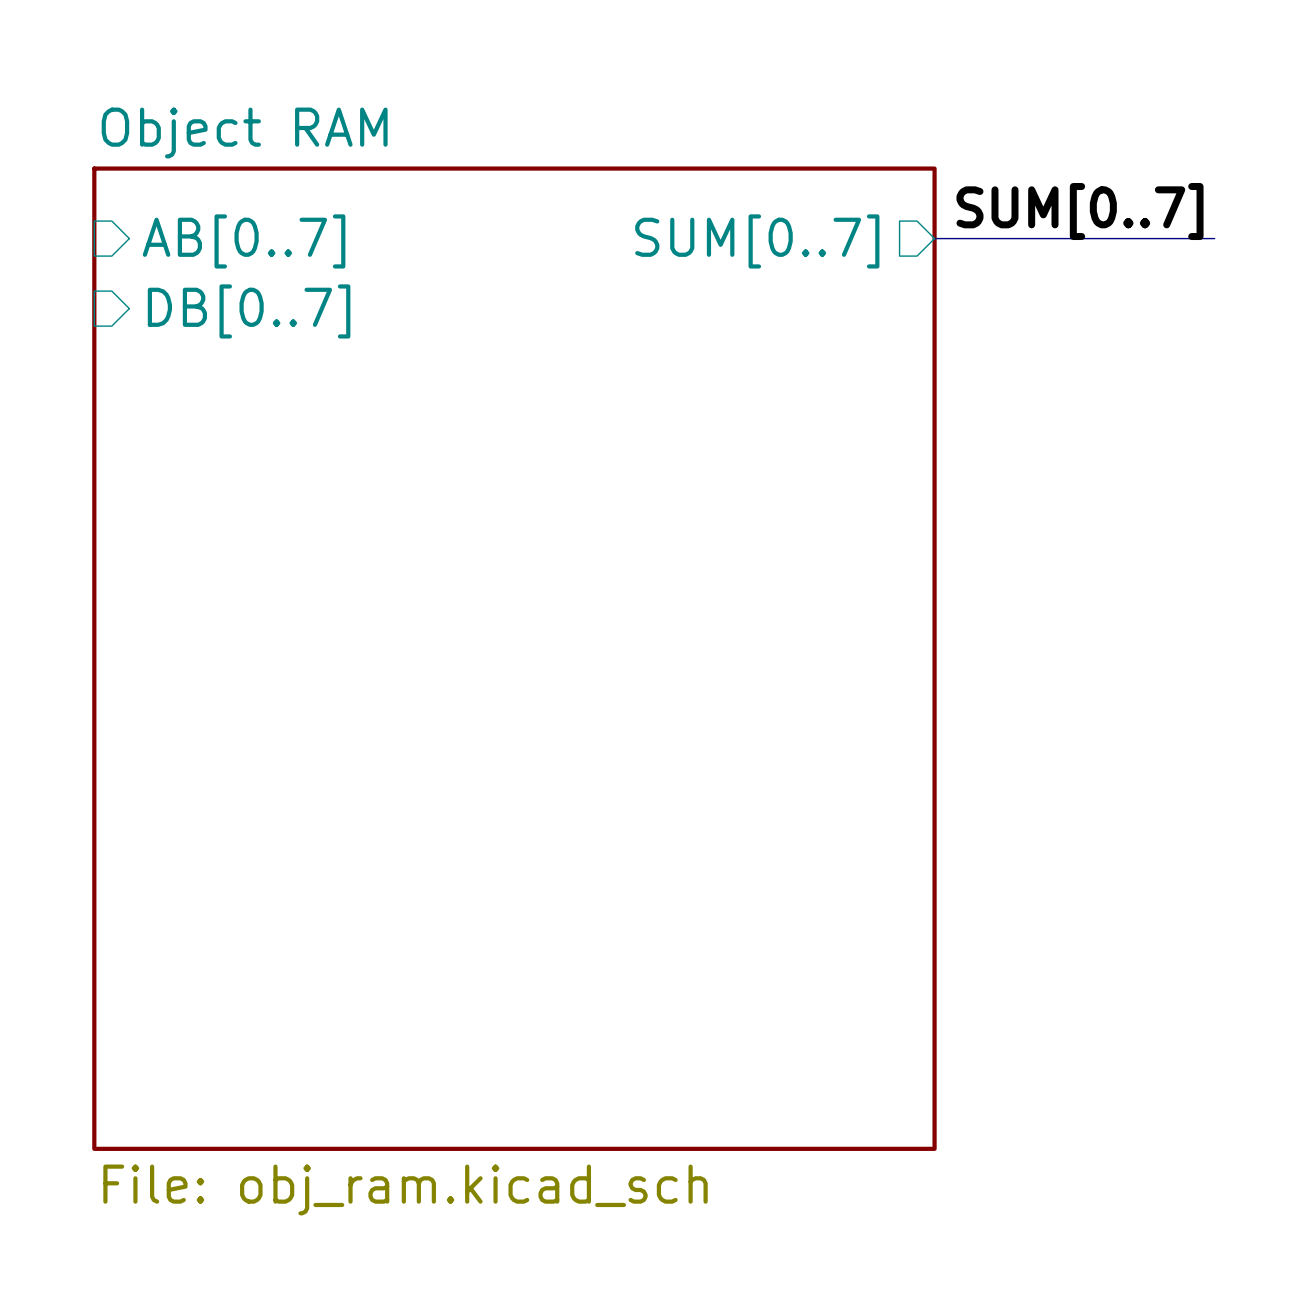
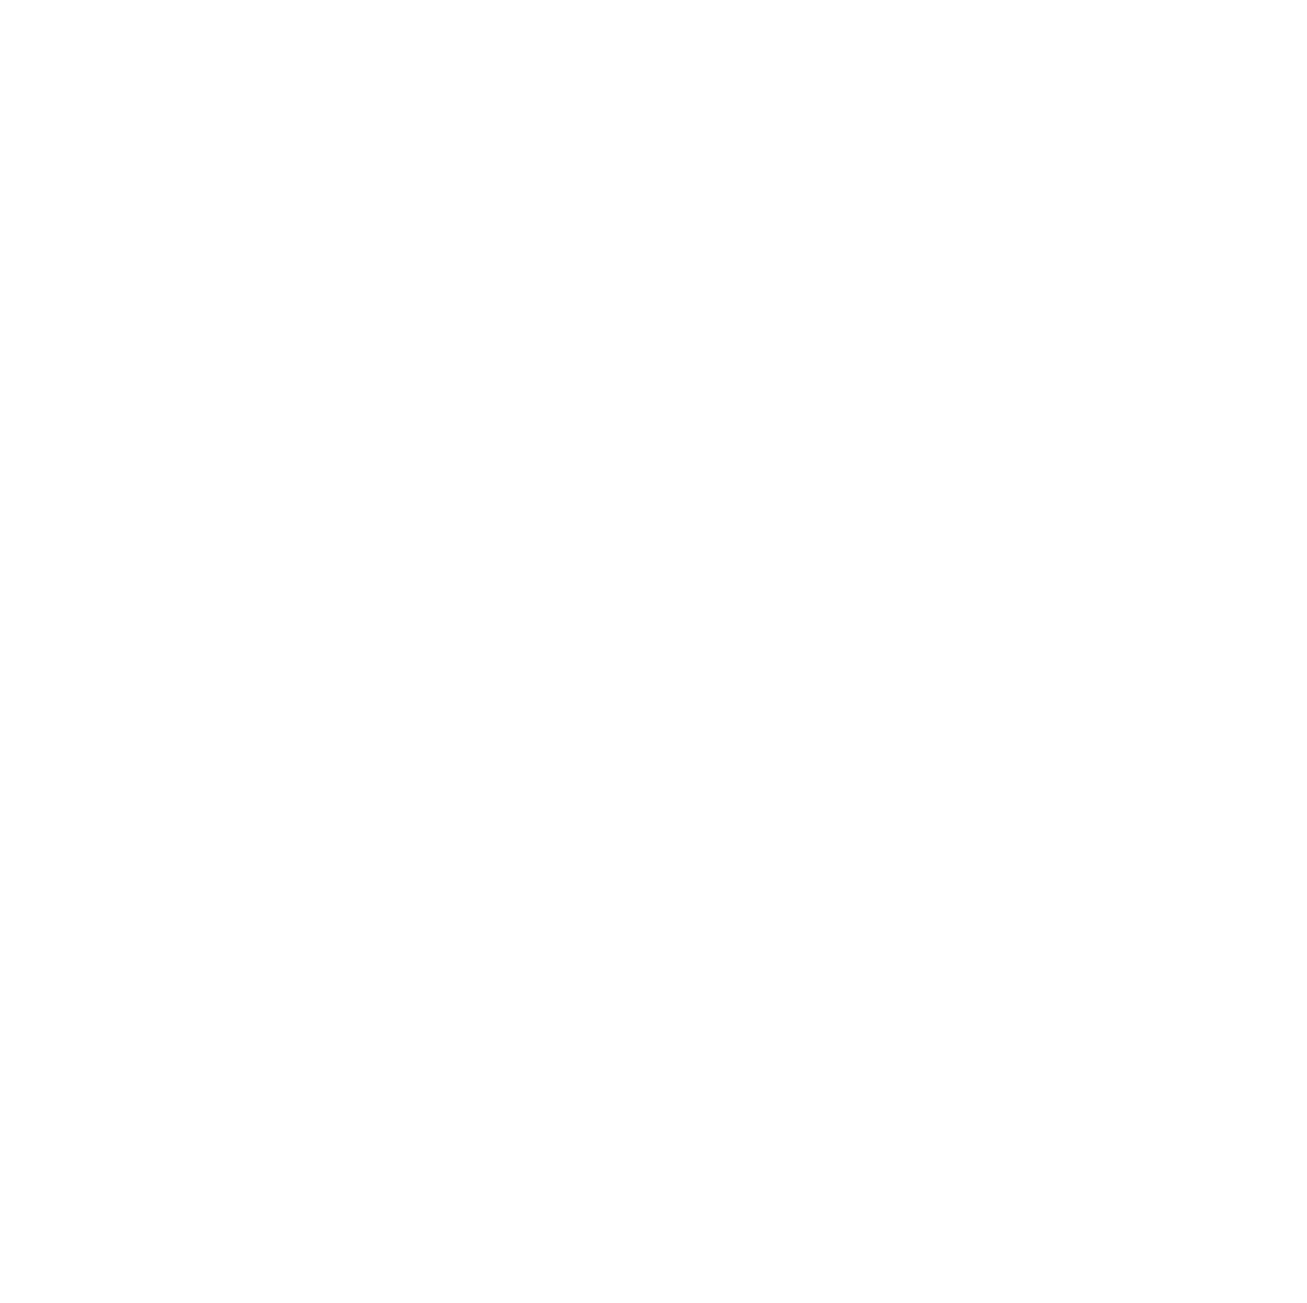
label: SUM[0..7] (1080, 211) -> none
bus: (934, 238) (1214, 238) -> none
sheet pin: AB[0..7] (244, 241) -> none
sheet pin: SUM[0..7] (757, 241) -> none
sheet pin: DB[0..7] (249, 311) -> none
sheet Object RAM: File: obj_ram.kicad_sch (514, 658) -> none

